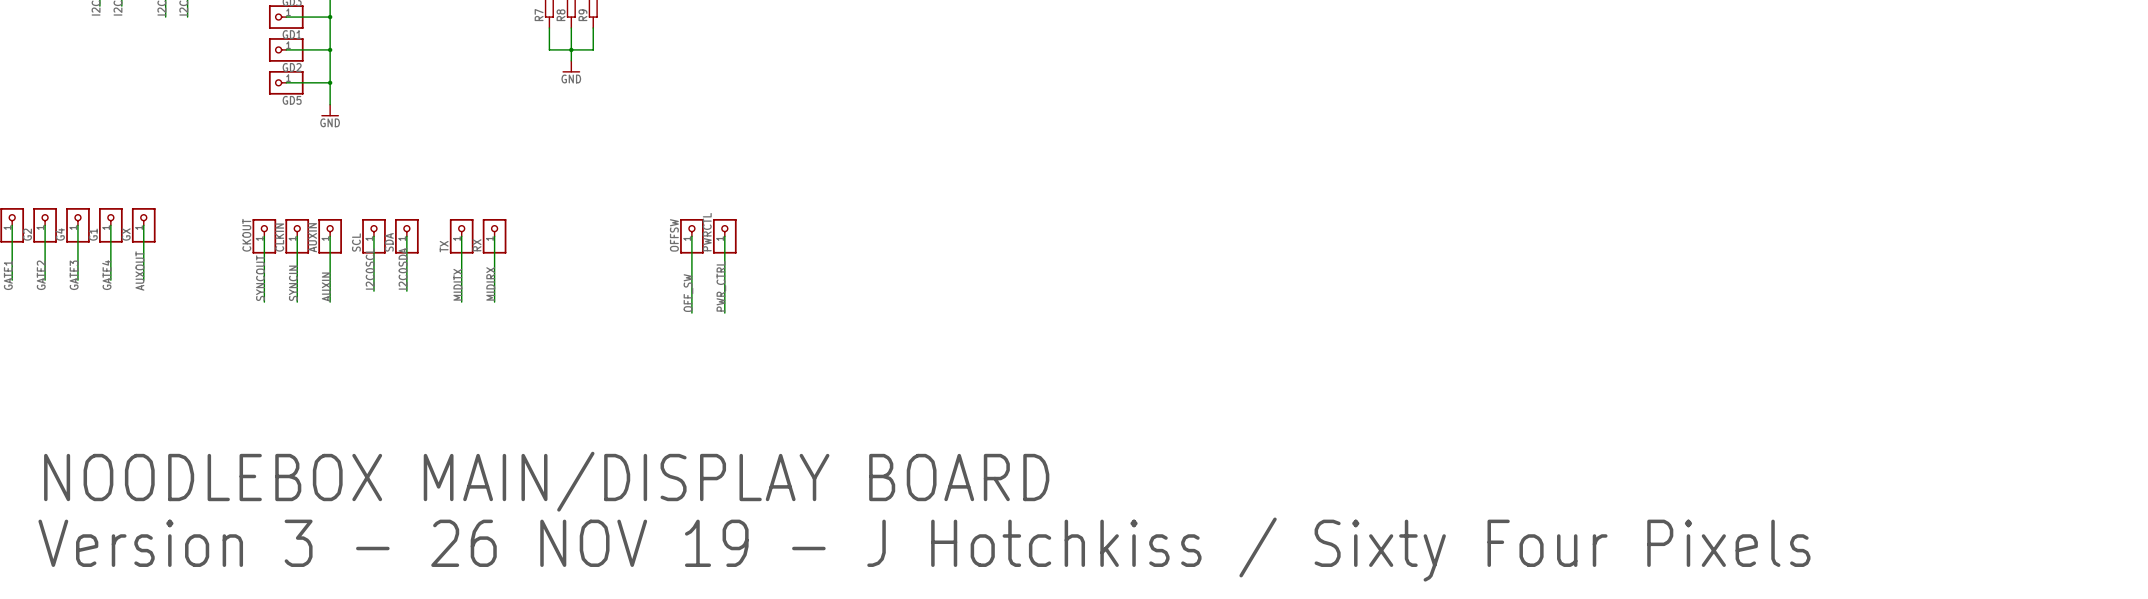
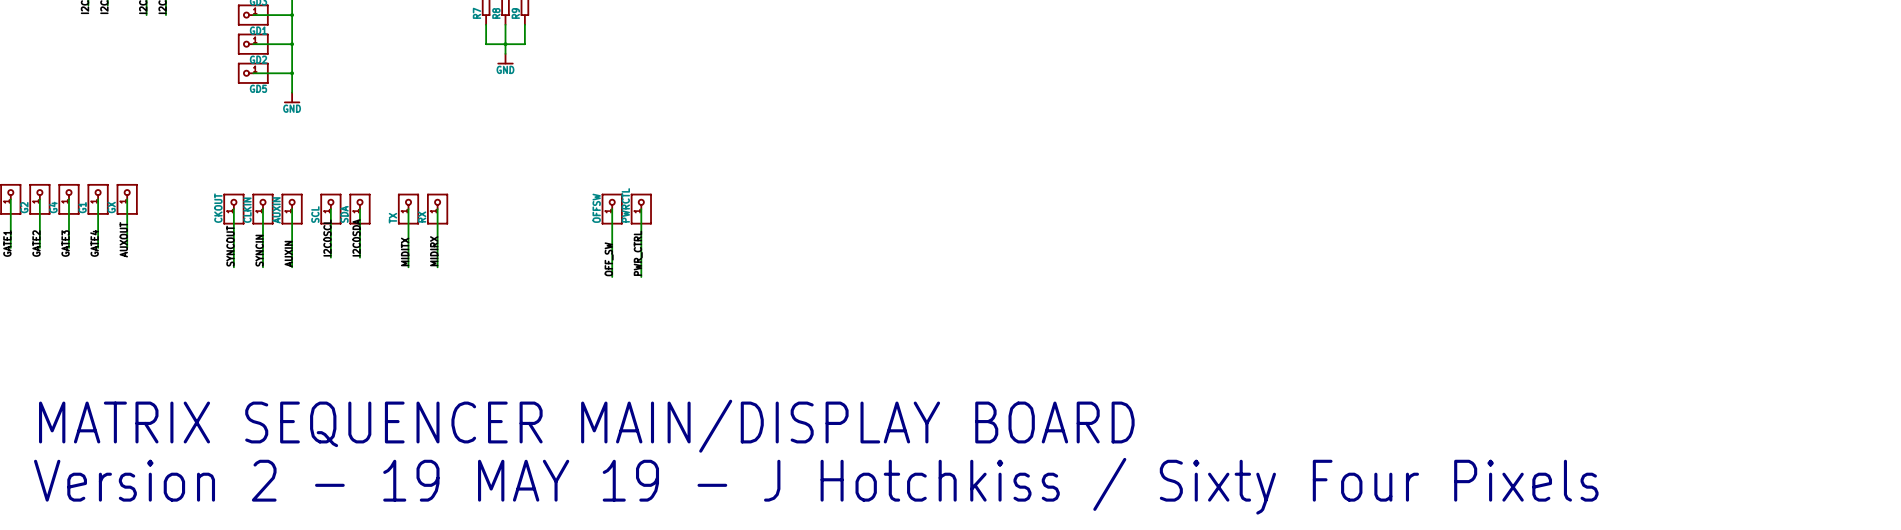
text: NOODLEBOX MAIN/DISPLAY BOARD (546, 481) -> MATRIX SEQUENCER MAIN/DISPLAY BOARD (586, 426)
text: Version 3 - 26 NOV 19 - J Hotchkiss / Sixty Four Pixels (924, 549) -> Version 2 - 19 MAY 19 - J Hotchkiss / Sixty Four Pixels (816, 486)

